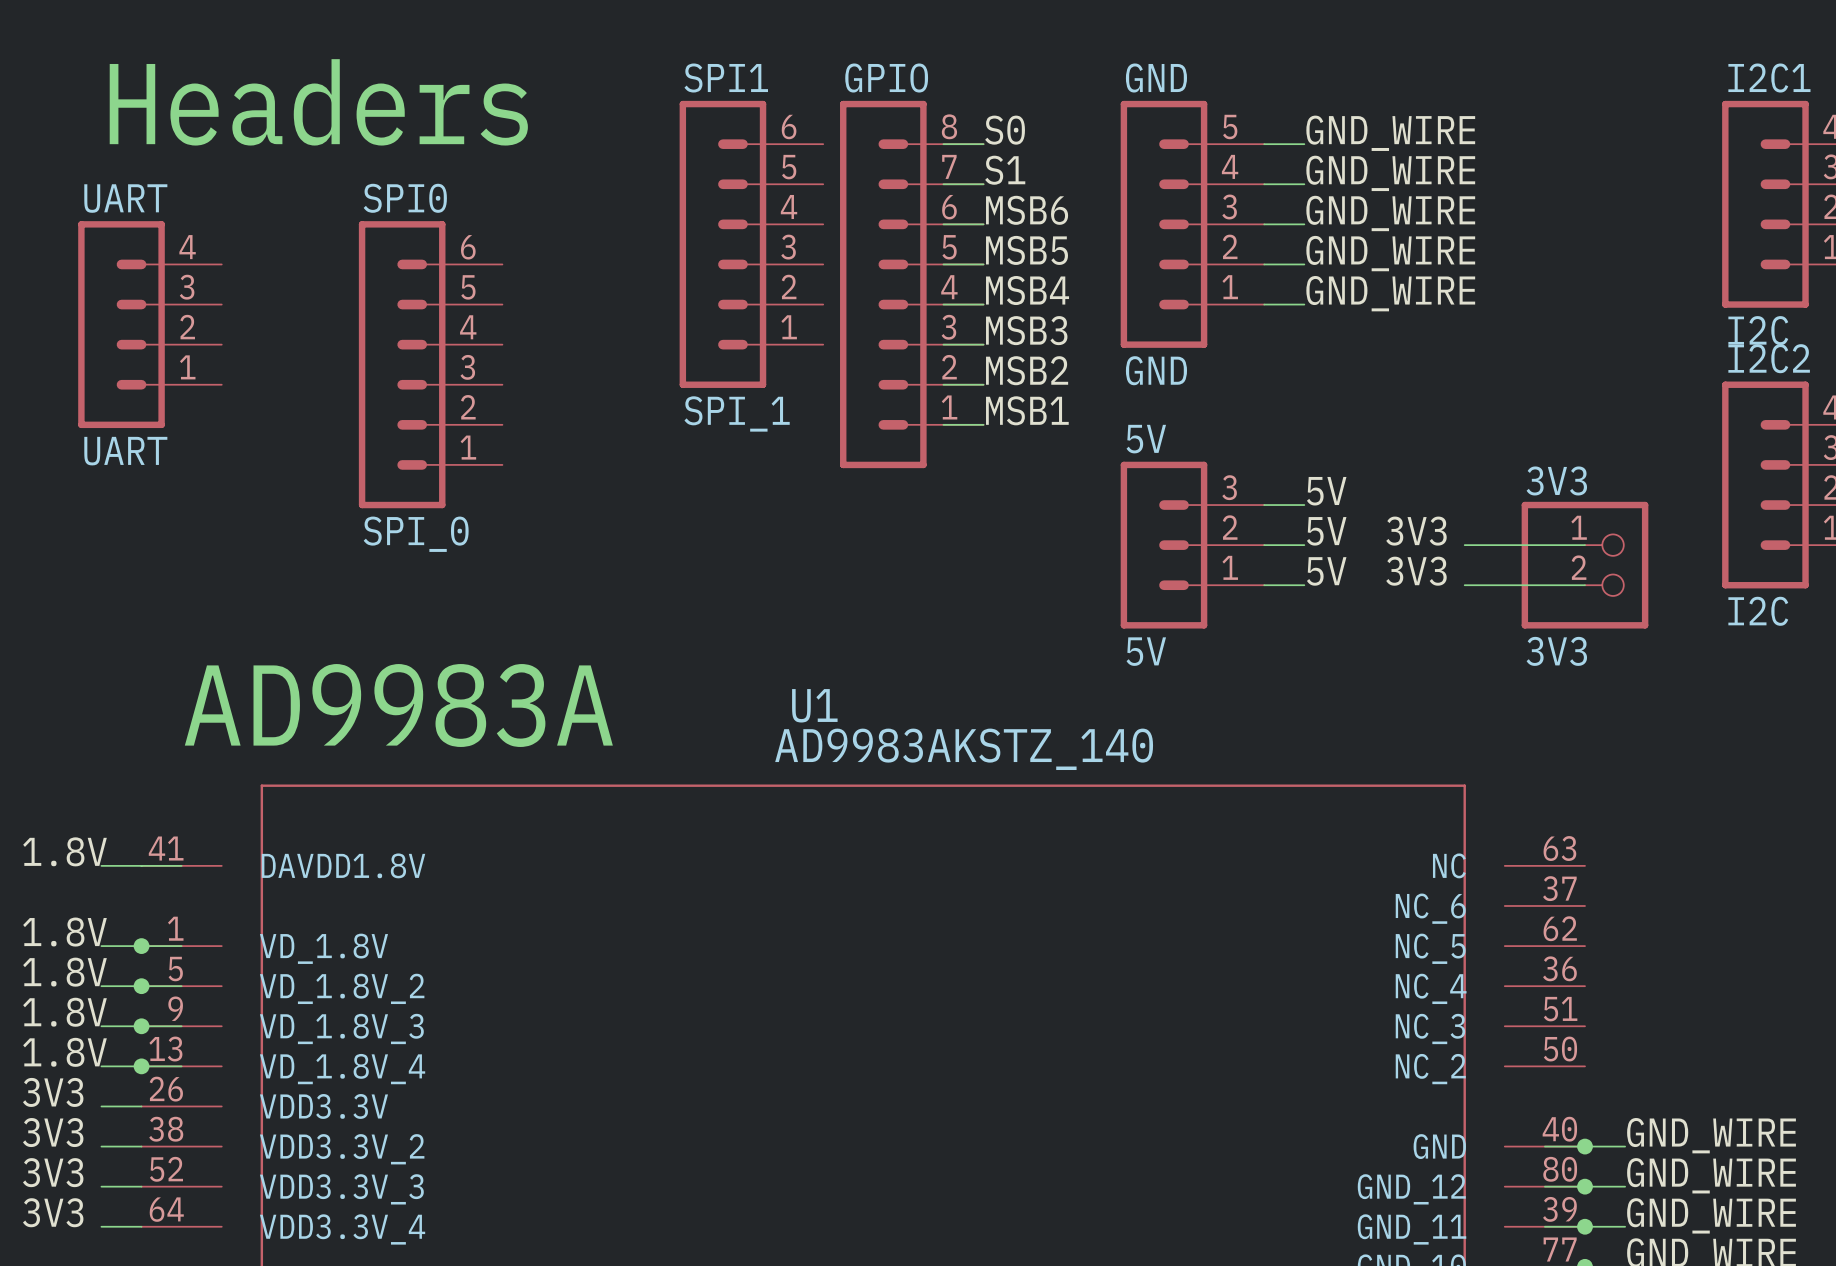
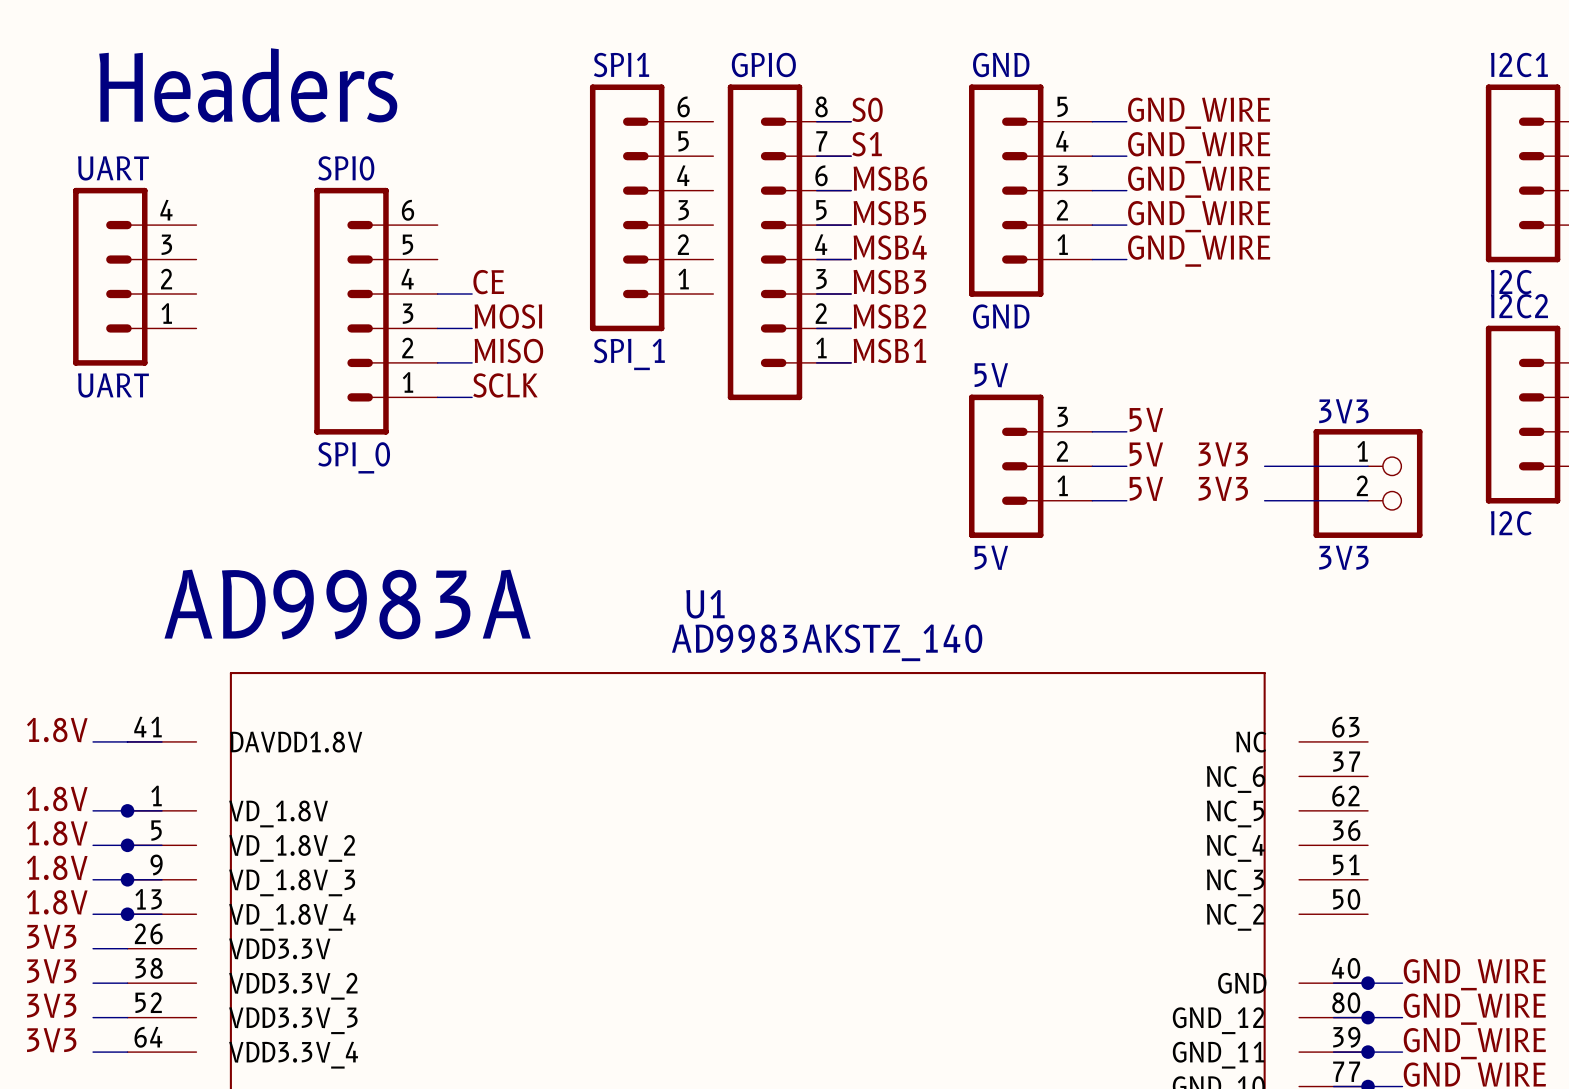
label: none -> CE (488, 282)
wire: none -> (437, 294) (472, 294)
label: none -> MOSI (508, 316)
wire: none -> (437, 328) (472, 328)
label: none -> MISO (508, 350)
wire: none -> (437, 362) (472, 362)
label: none -> SCLK (505, 385)
wire: none -> (437, 397) (472, 397)

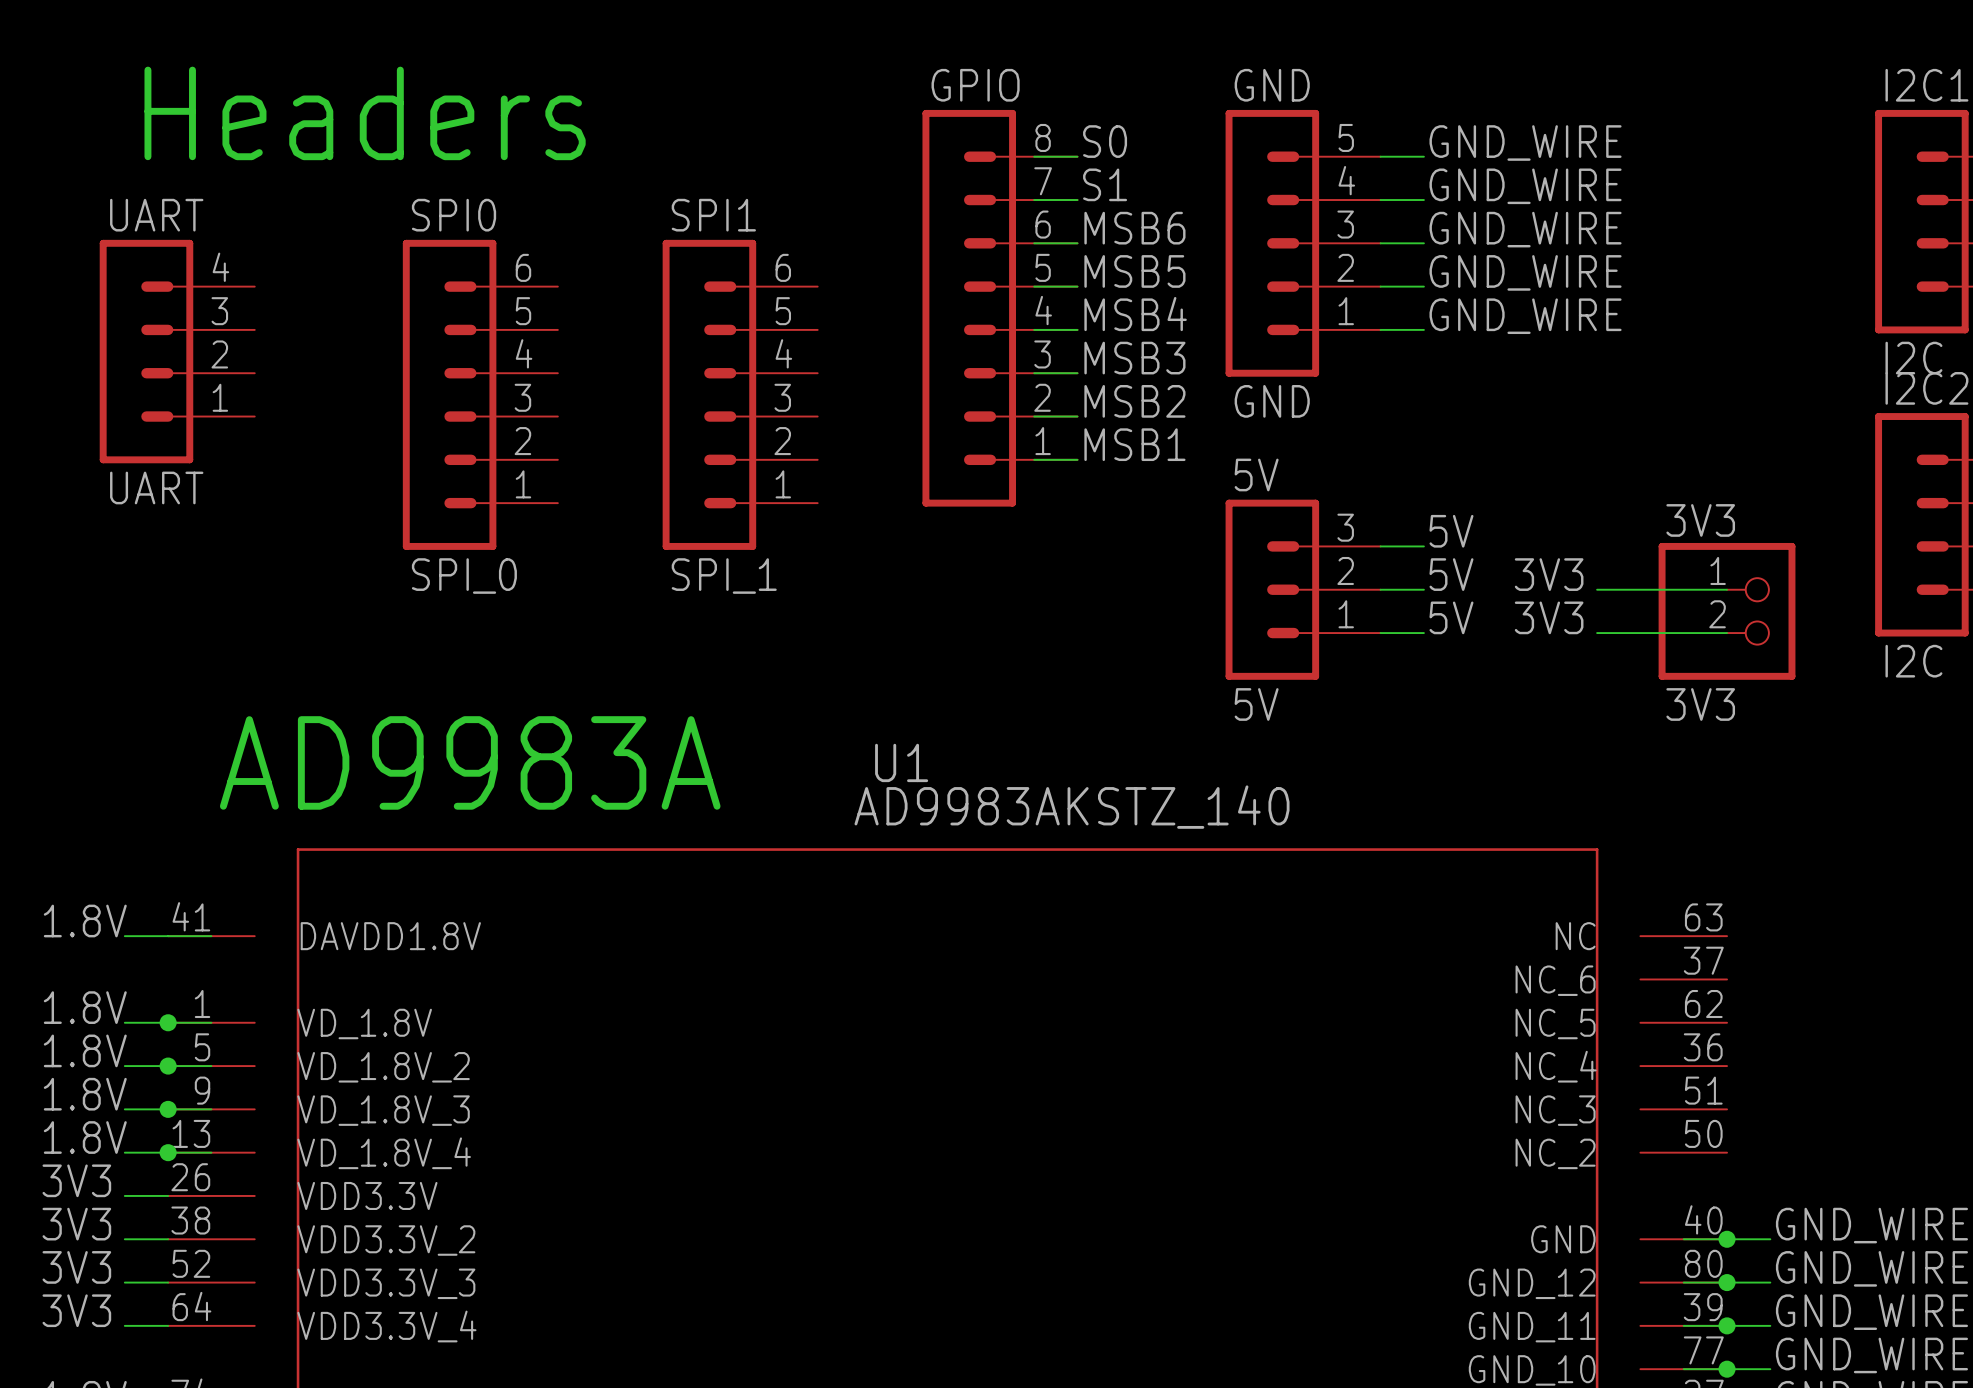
SPI1 position: (651, 207) -> (740, 394)
label: CE (488, 282) -> none
wire: (437, 294) (472, 294) -> none
label: MOSI (508, 316) -> none
wire: (437, 328) (472, 328) -> none
label: MISO (508, 350) -> none
wire: (437, 362) (472, 362) -> none
label: SCLK (505, 385) -> none
wire: (437, 397) (472, 397) -> none

